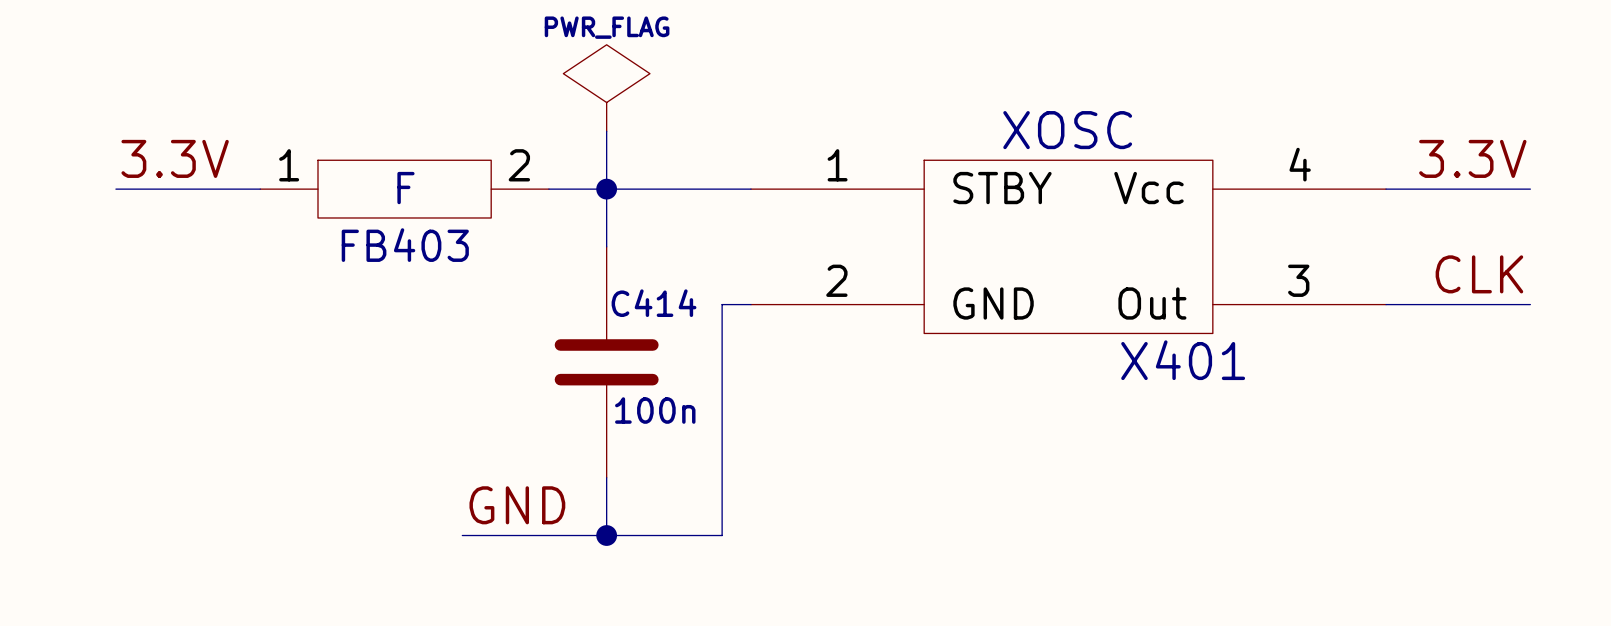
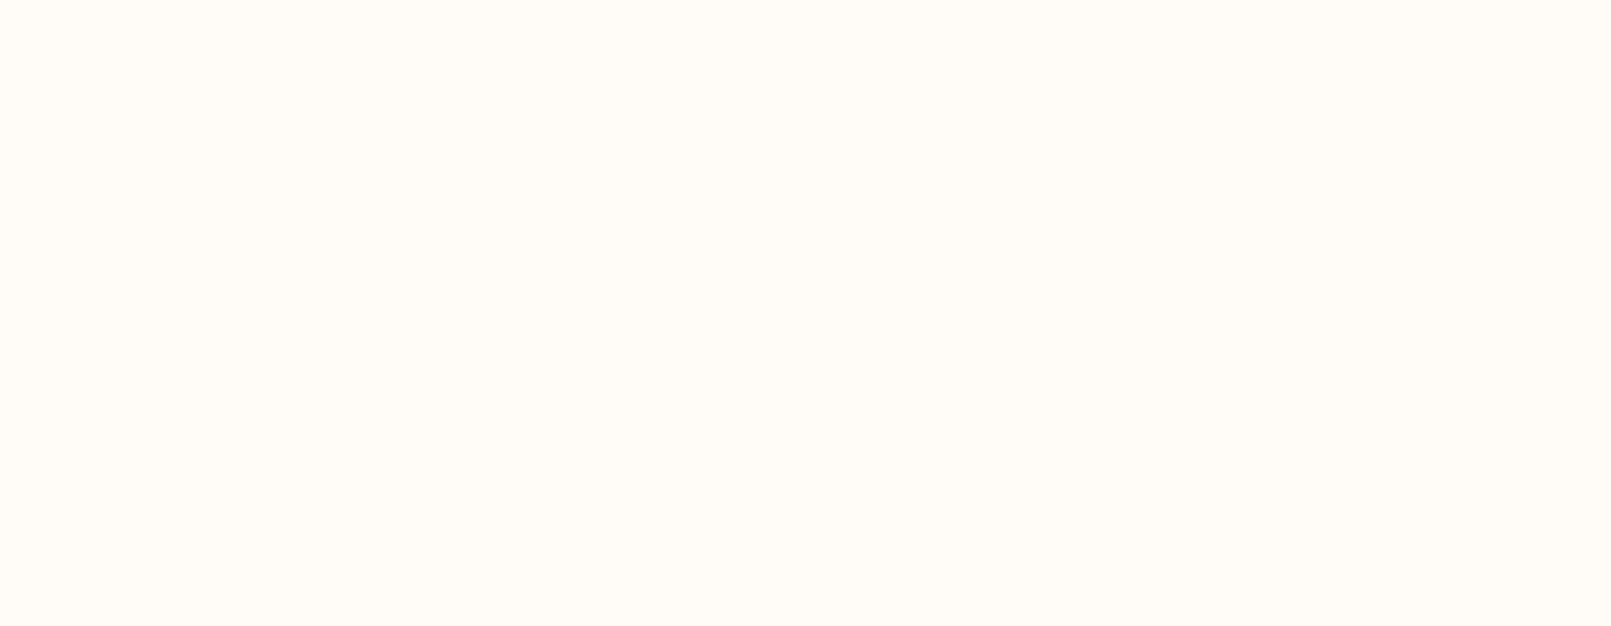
power symbol: PWR_FLAG (606, 88) -> none
wire: (606, 131) (606, 246) -> none
label: 3.3V (175, 158) -> none
label: 3.3V (1472, 158) -> none
wire: (115, 189) (260, 189) -> none
FB403: F (404, 189) -> none
wire: (548, 189) (750, 189) -> none
junction: (606, 189) -> none
wire: (1386, 189) (1530, 189) -> none
X401: XOSC (1068, 246) -> none
label: CLK (1479, 274) -> none
wire: (750, 304) (722, 304) (722, 535) (462, 535) -> none
wire: (1386, 304) (1530, 304) -> none
C414: 100n (606, 362) -> none
wire: (606, 477) (606, 535) -> none
label: GND (517, 505) -> none
junction: (606, 535) -> none

